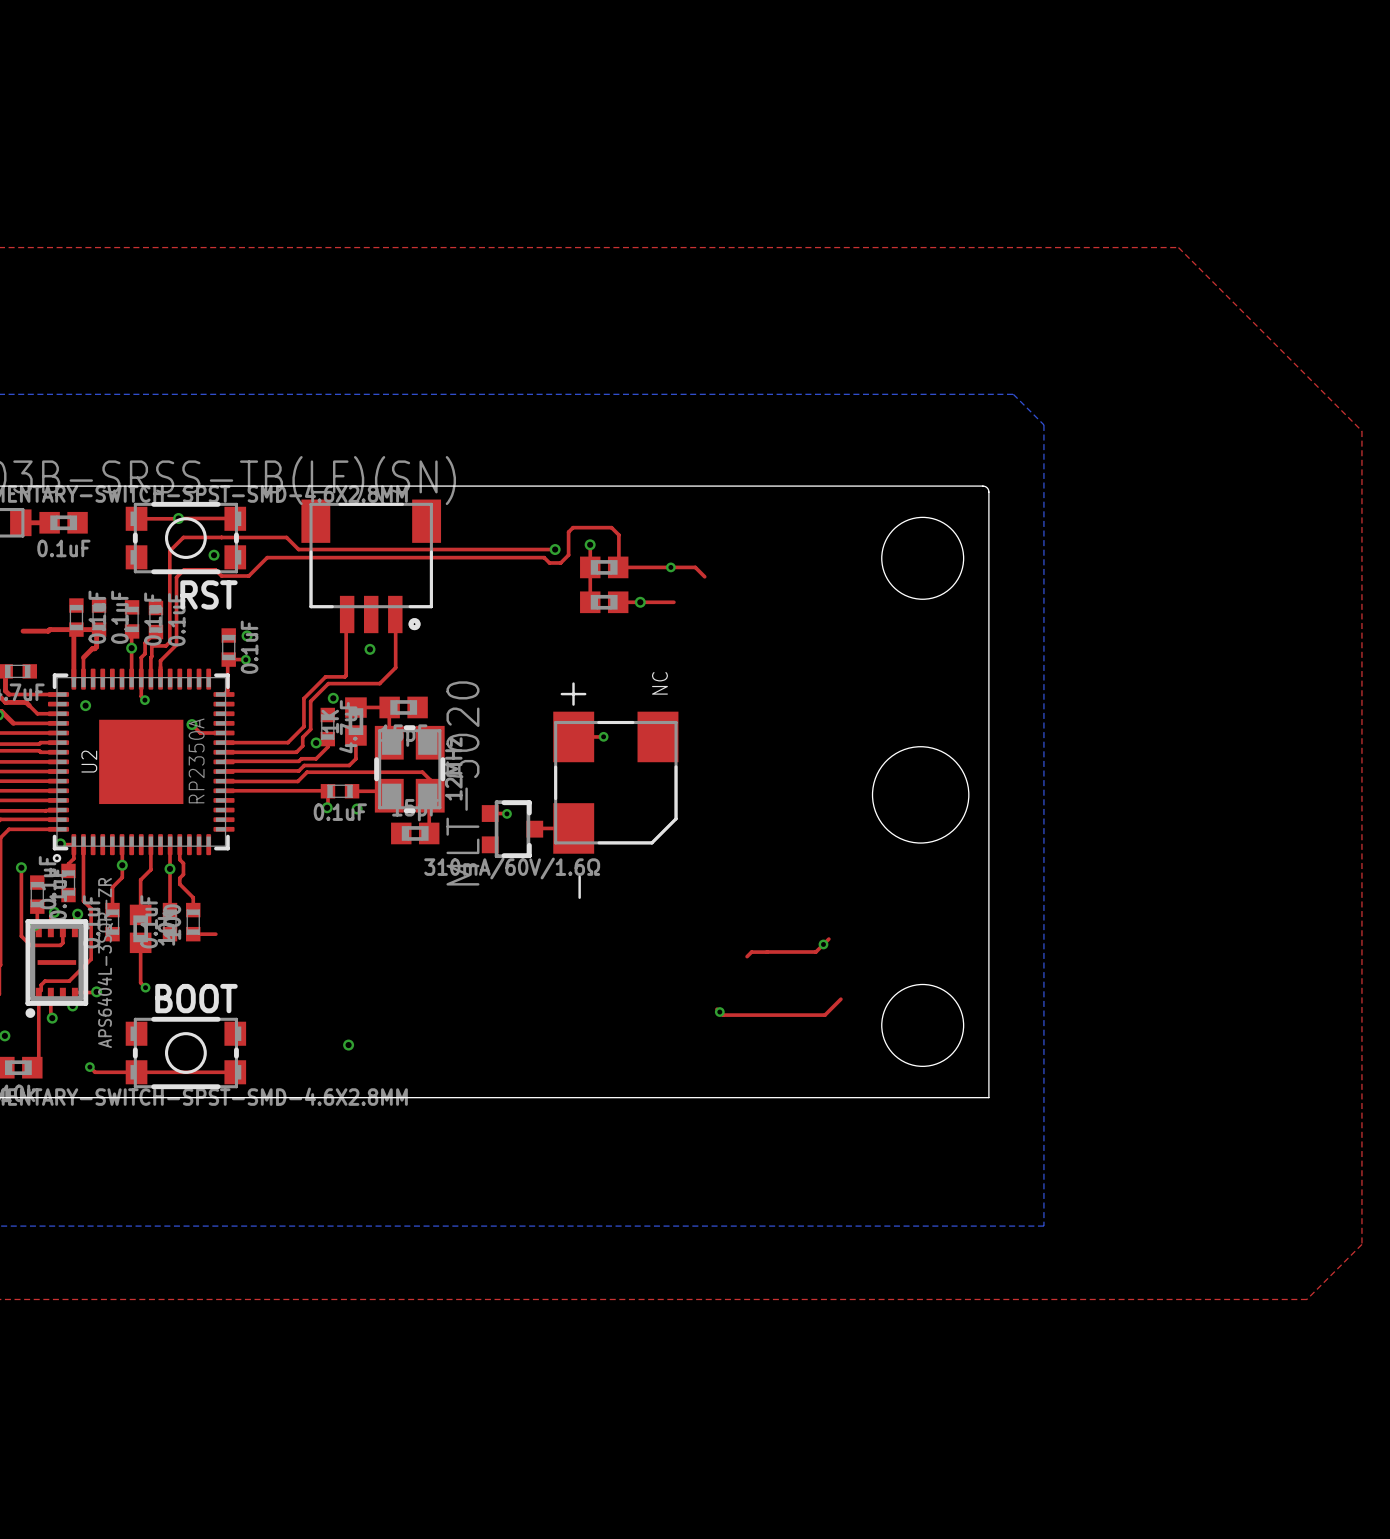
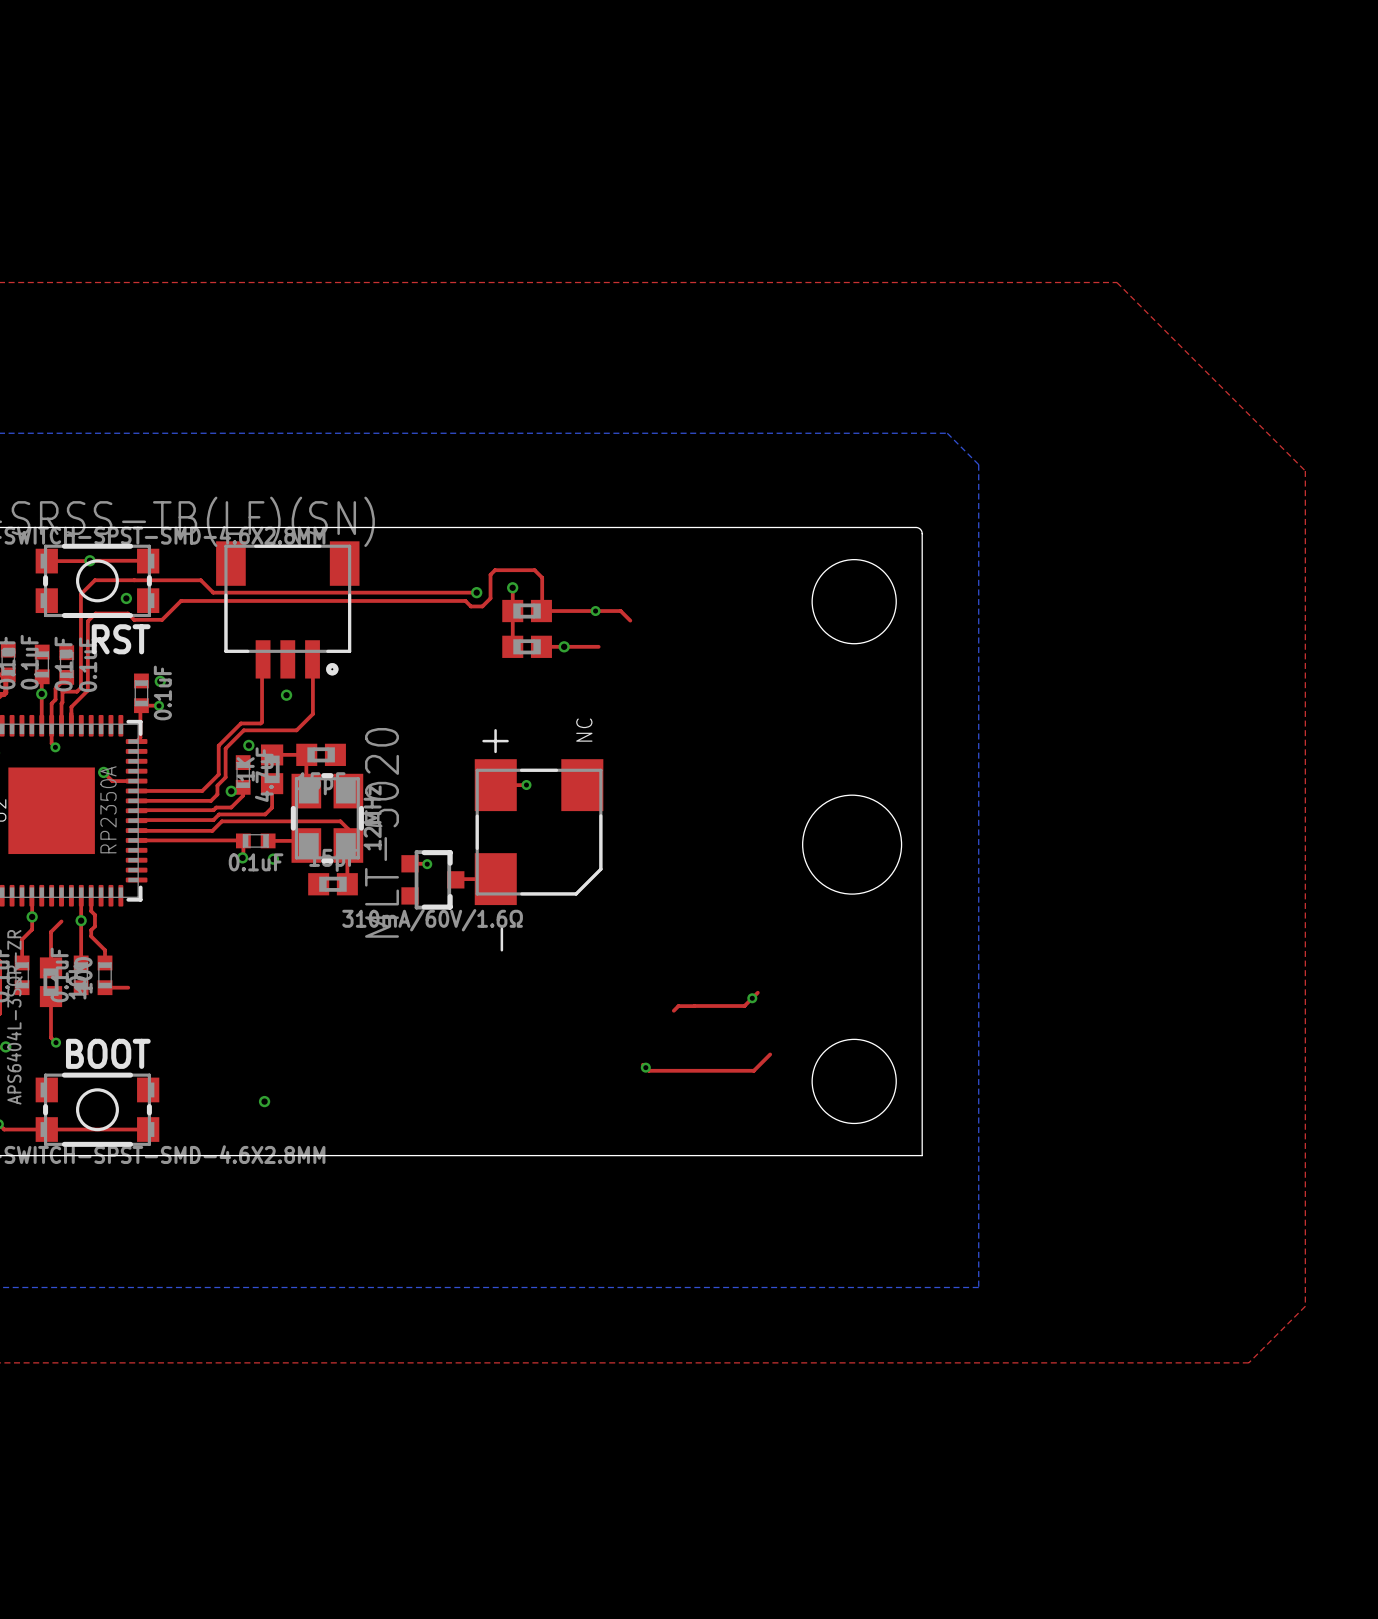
top track: (150, 844) (150, 869) -> none

